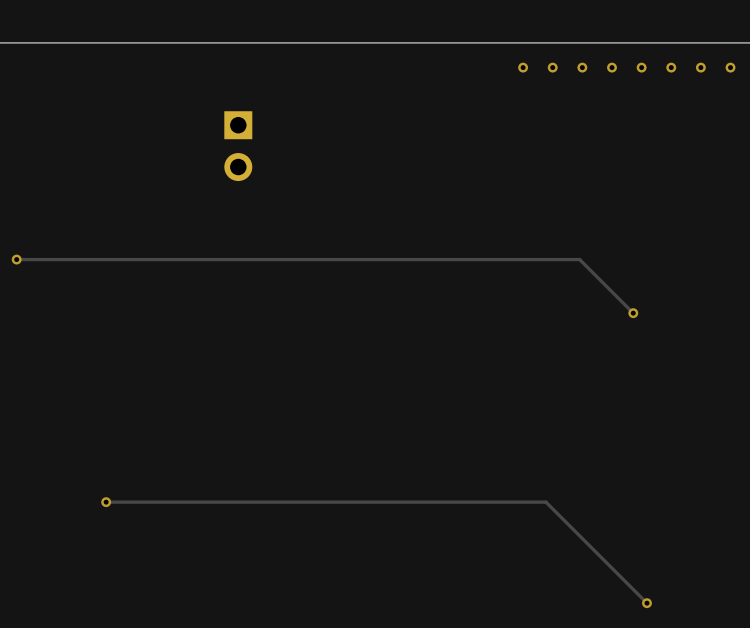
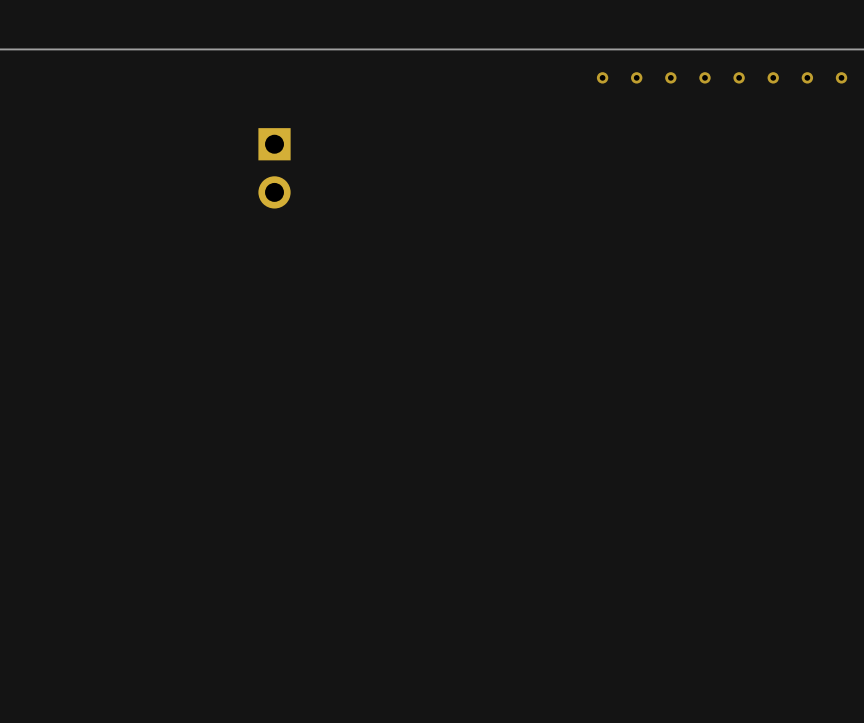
track: (16, 259) (579, 259) (633, 313) -> none
via: (16, 259) -> none
via: (633, 313) -> none
track: (106, 502) (545, 502) (646, 603) -> none
via: (106, 502) -> none
via: (646, 603) -> none

